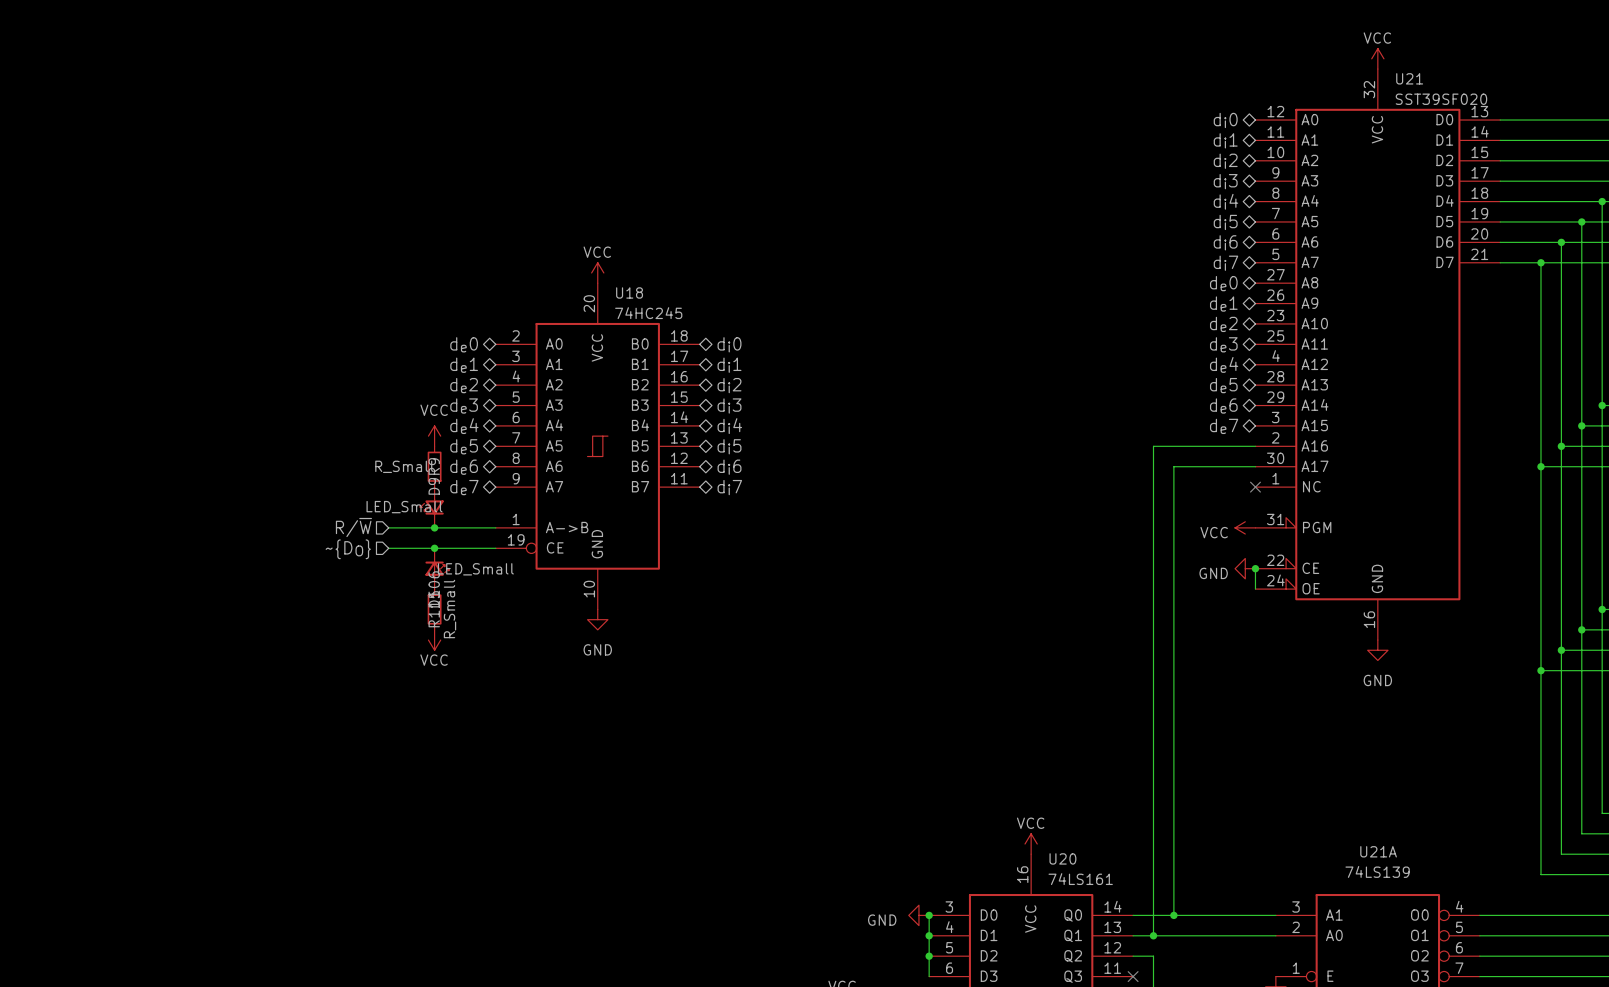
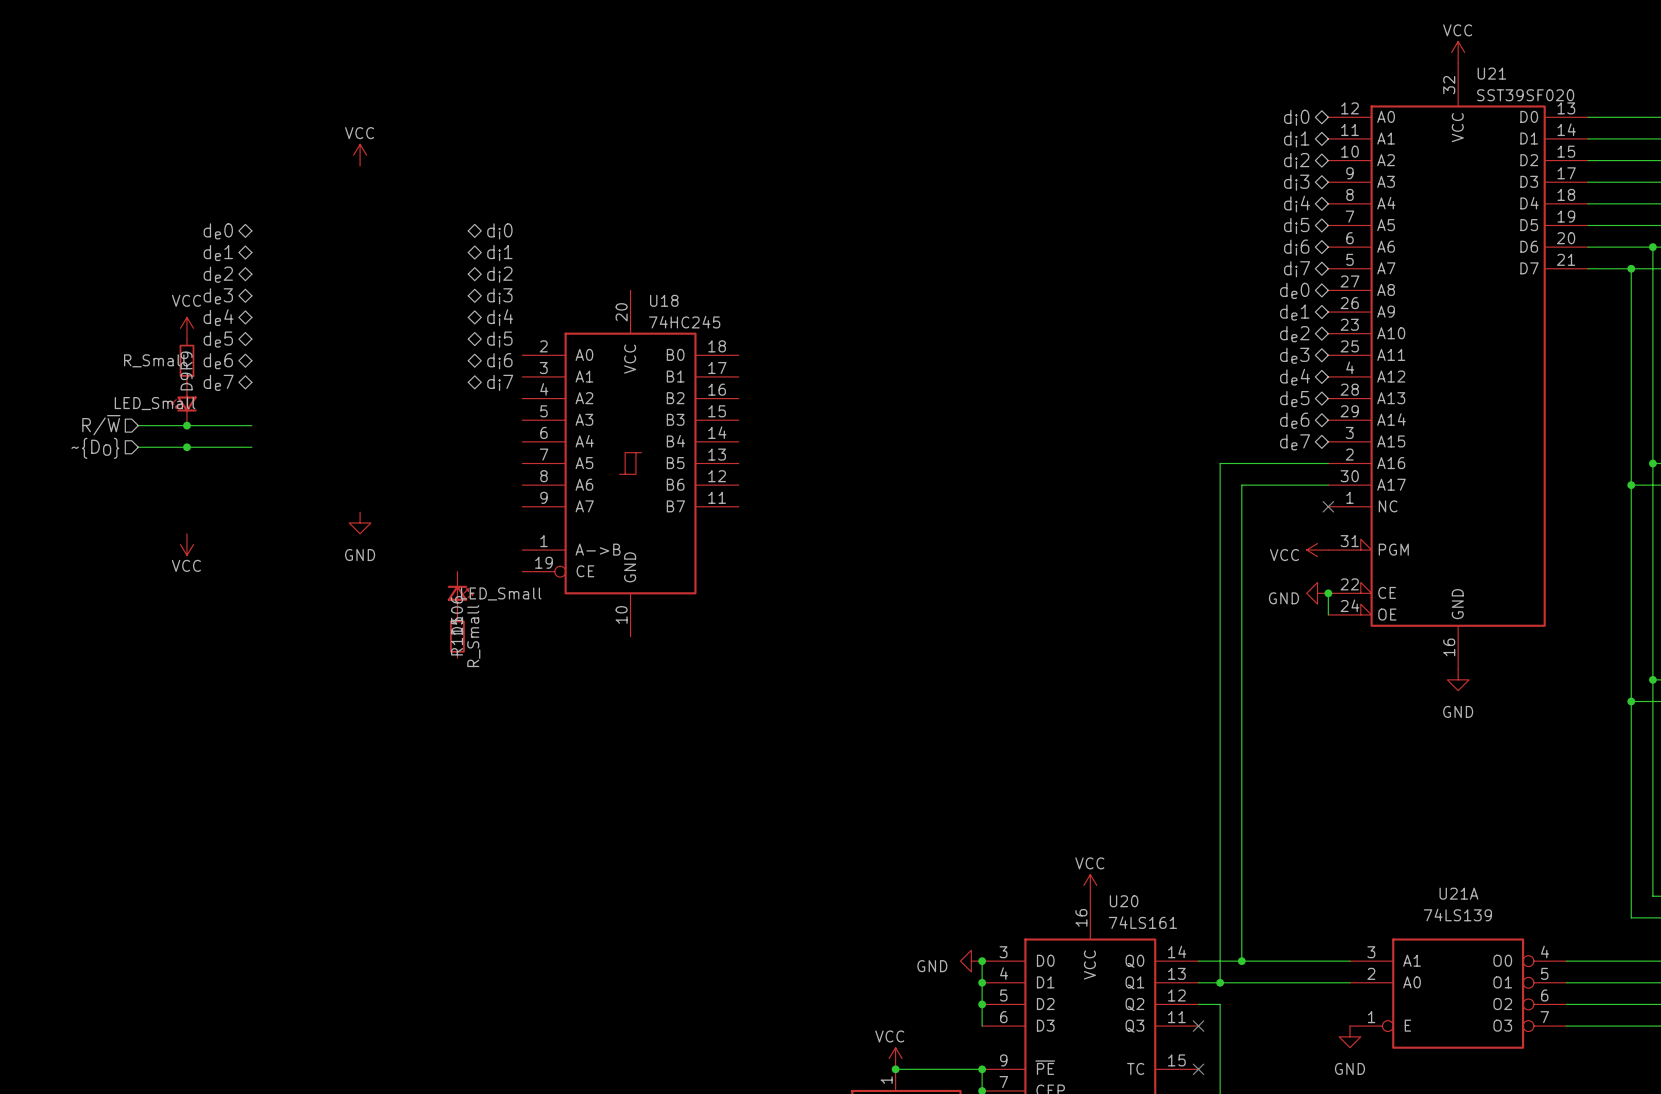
power symbol: none -> VCC (360, 155)
hierarchical label: none -> de0 (218, 231)
hierarchical label: none -> di0 (499, 231)
hierarchical label: none -> de1 (218, 253)
hierarchical label: none -> di1 (499, 253)
hierarchical label: none -> de2 (218, 274)
hierarchical label: none -> di2 (499, 274)
power symbol: VCC (597, 272) -> none
hierarchical label: none -> de3 (218, 296)
hierarchical label: none -> di3 (499, 296)
hierarchical label: none -> de4 (218, 317)
hierarchical label: none -> di4 (500, 317)
power symbol: none -> VCC (186, 328)
hierarchical label: none -> de5 (218, 339)
hierarchical label: none -> di5 (499, 339)
hierarchical label: de0 (464, 344) -> none
hierarchical label: di0 (729, 344) -> none
hierarchical label: none -> de6 (218, 361)
hierarchical label: none -> di6 (499, 361)
hierarchical label: de1 (464, 365) -> none
hierarchical label: di1 (729, 365) -> none
hierarchical label: none -> de7 (218, 382)
hierarchical label: none -> di7 (500, 382)
hierarchical label: de2 (464, 385) -> none
hierarchical label: di2 (729, 385) -> none
hierarchical label: de3 (464, 405) -> none
hierarchical label: di3 (729, 405) -> none
hierarchical label: none -> R/~{W} (101, 425)
wire: none -> (138, 425) (251, 425)
junction: none -> (186, 425)
hierarchical label: de4 (464, 426) -> none
hierarchical label: di4 (729, 426) -> none
wire: none -> (138, 447) (251, 447)
junction: none -> (186, 447)
hierarchical label: none -> ~{DO} (95, 448)
power symbol: VCC (434, 436) -> none
hierarchical label: de5 (464, 446) -> none
hierarchical label: di5 (729, 446) -> none
R9 position: (434, 466) -> (186, 360)
hierarchical label: de6 (464, 467) -> none
hierarchical label: di6 (729, 467) -> none
hierarchical label: de7 (464, 487) -> none
hierarchical label: di7 (729, 487) -> none
power symbol: none -> GND (360, 523)
D9 position: (432, 507) -> (184, 403)
power symbol: none -> VCC (186, 544)
hierarchical label: R/~{W} (353, 527) -> none
wire: (388, 527) (495, 527) -> none
junction: (434, 527) -> none
wire: (388, 548) (495, 548) -> none
junction: (434, 548) -> none
hierarchical label: ~{DO} (348, 549) -> none
power symbol: GND (597, 619) -> none
power symbol: VCC (434, 640) -> none

